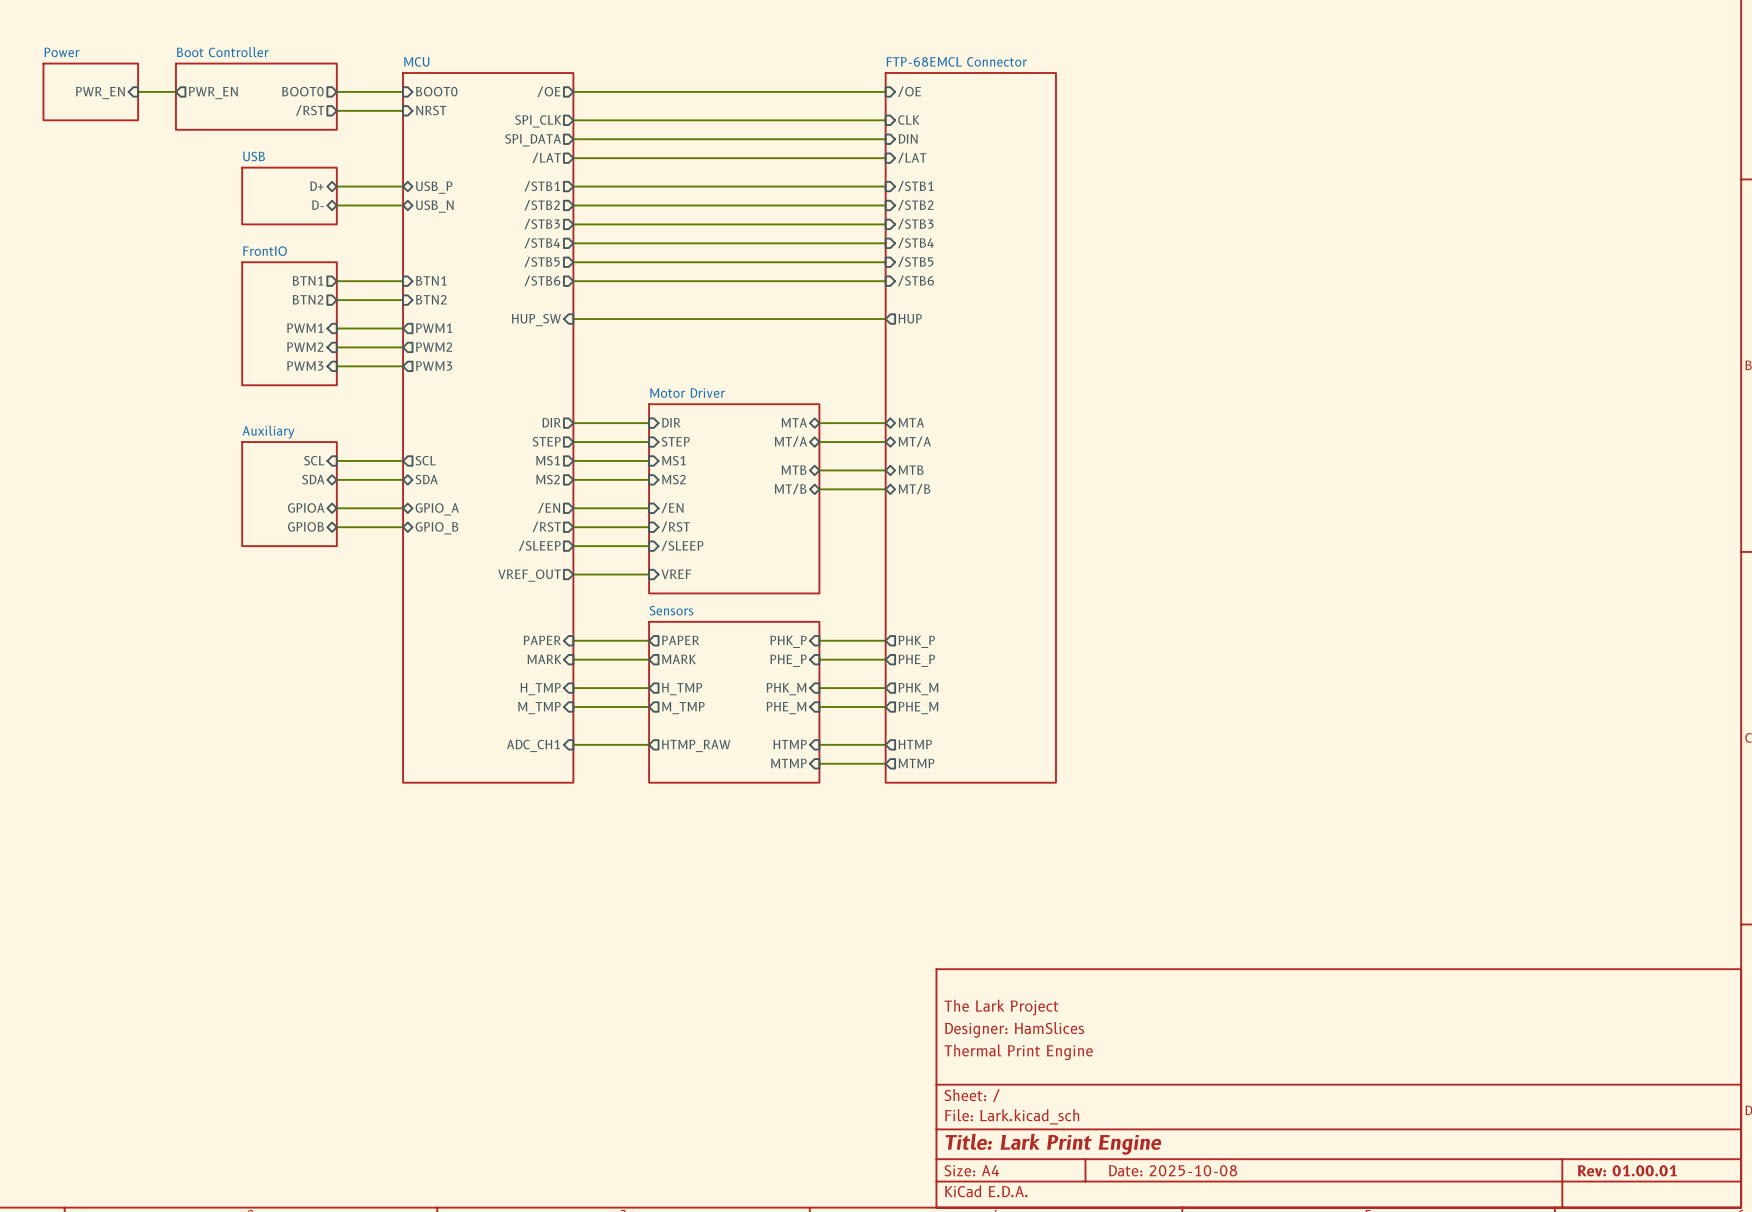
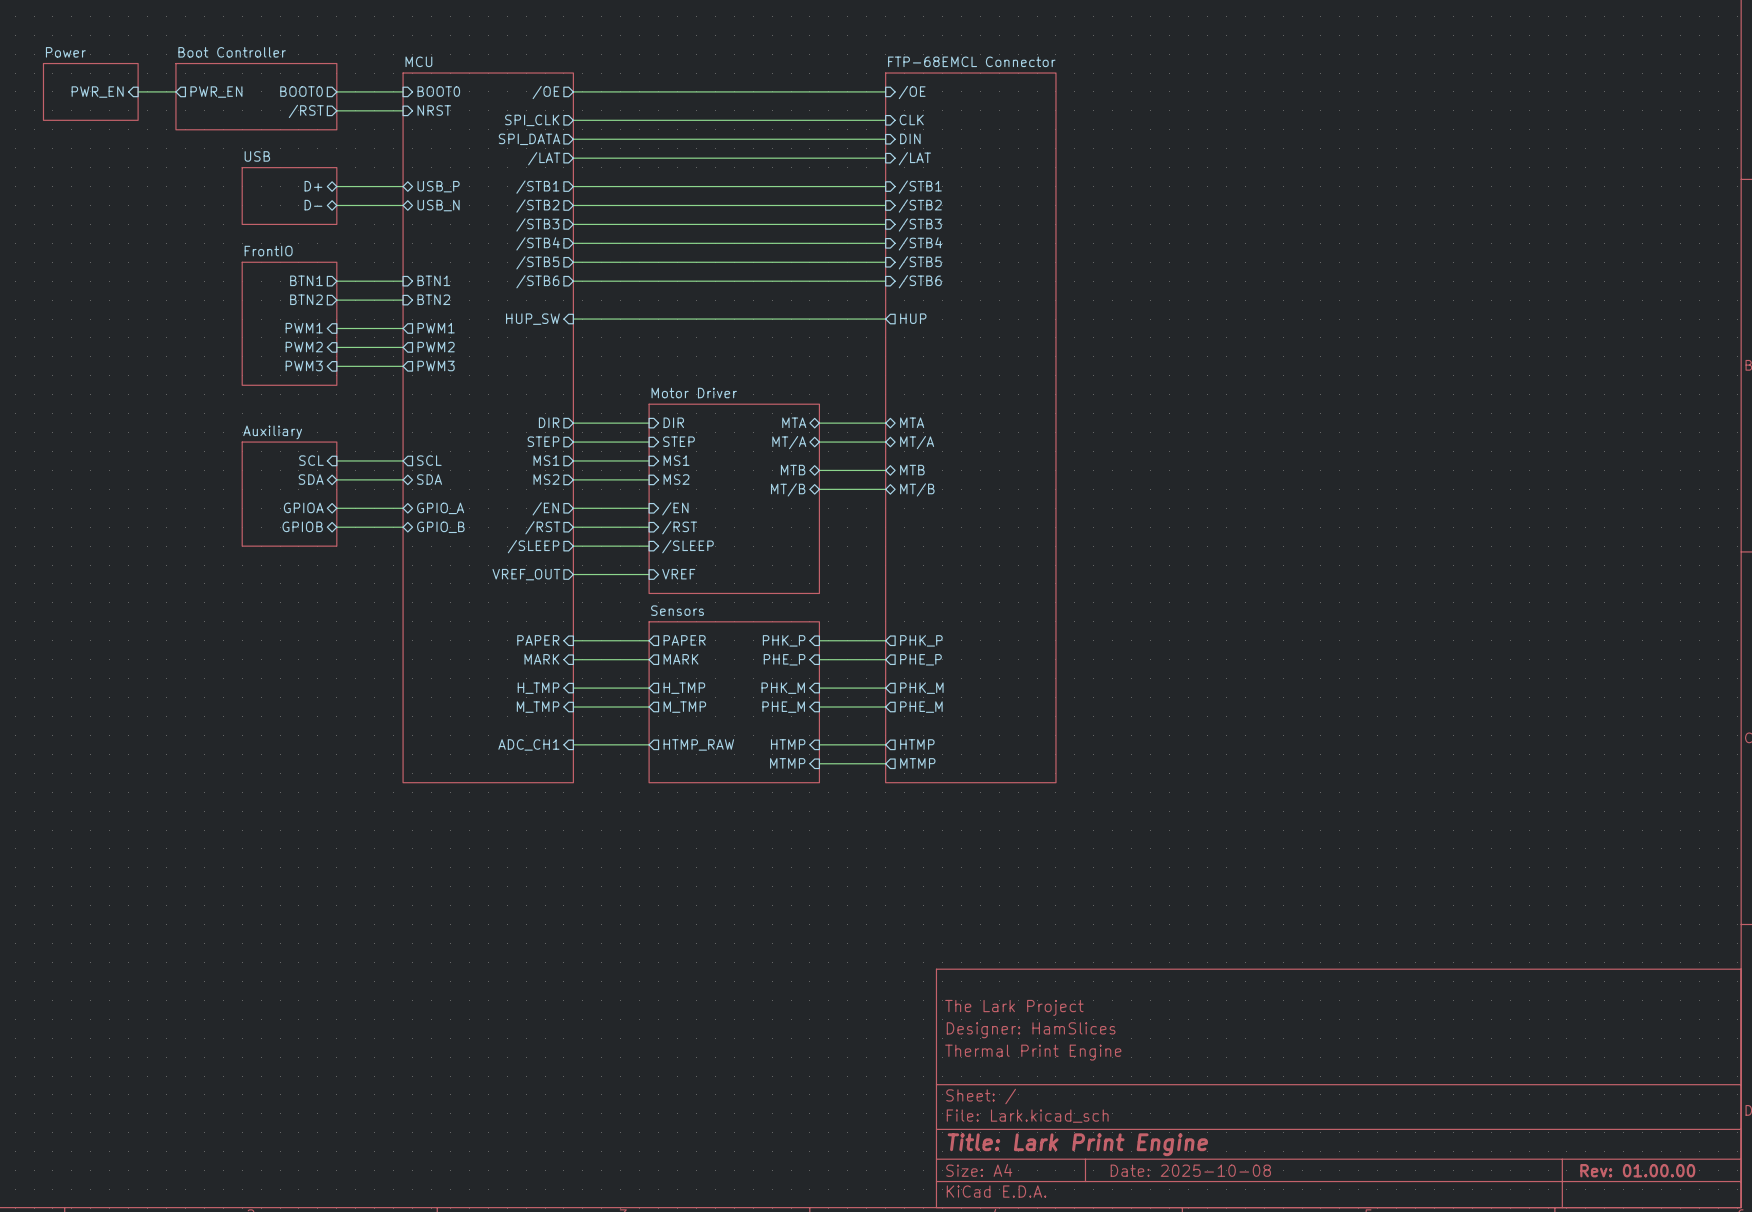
title block: Rev: 01.00.01 (1627, 1170) -> Rev: 01.00.00 (1637, 1170)

